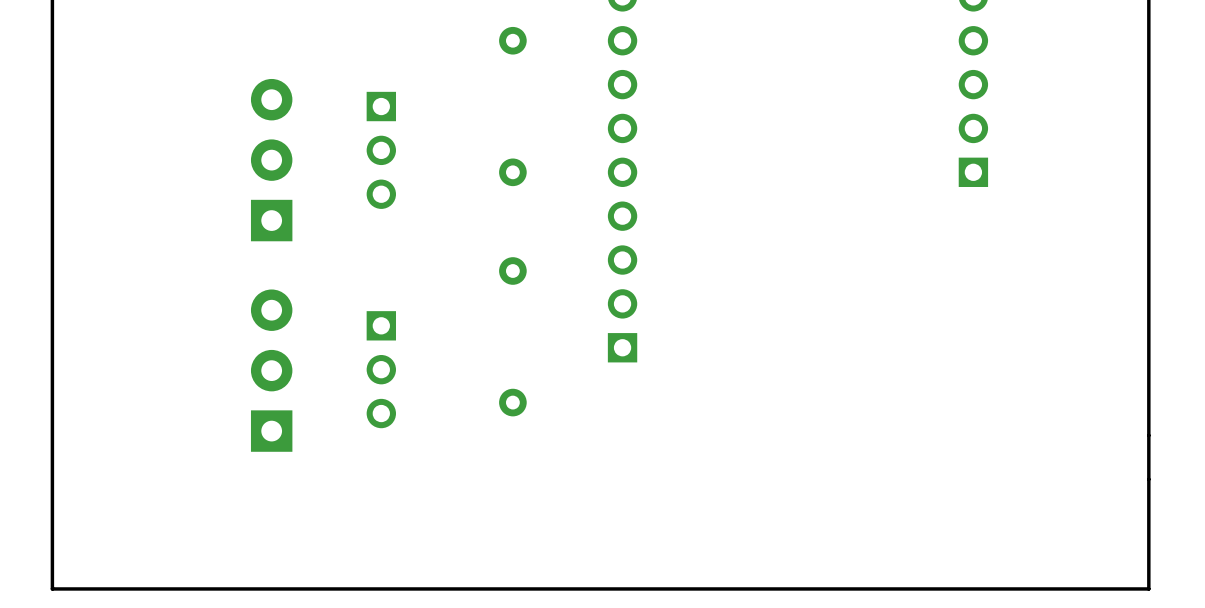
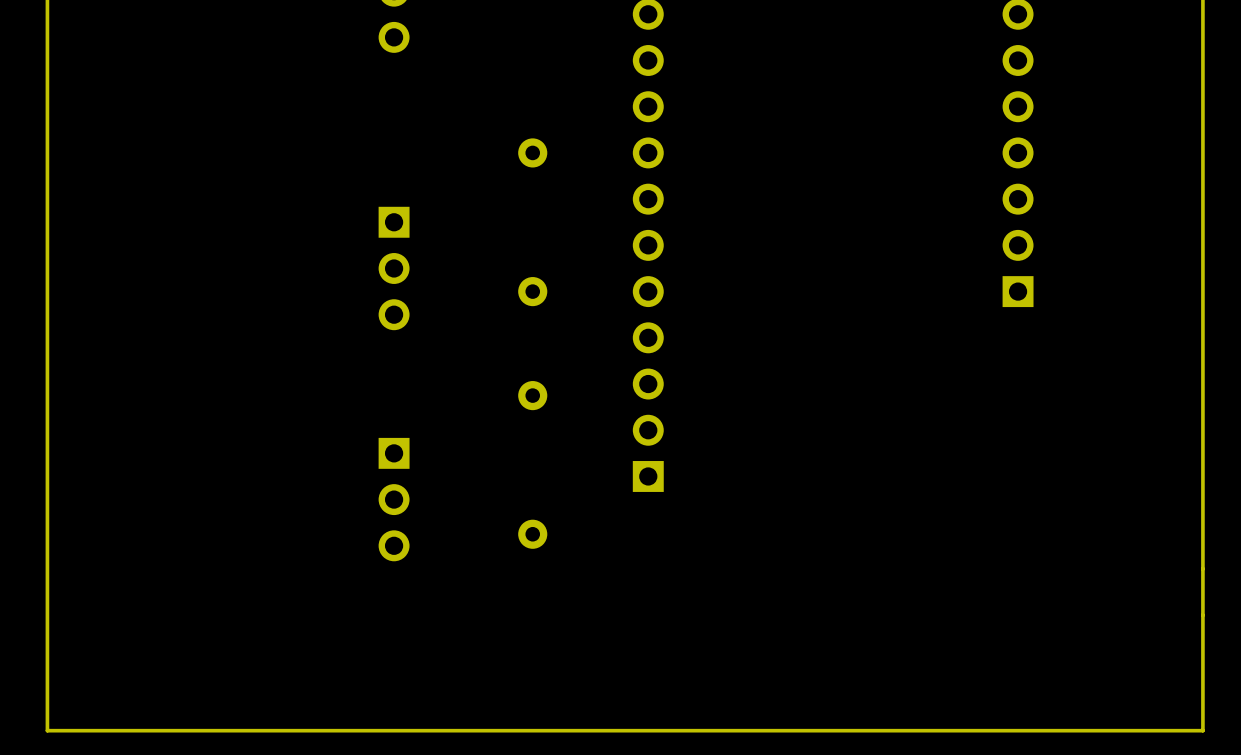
part: (271, 160) -> none
part: (271, 370) -> none

